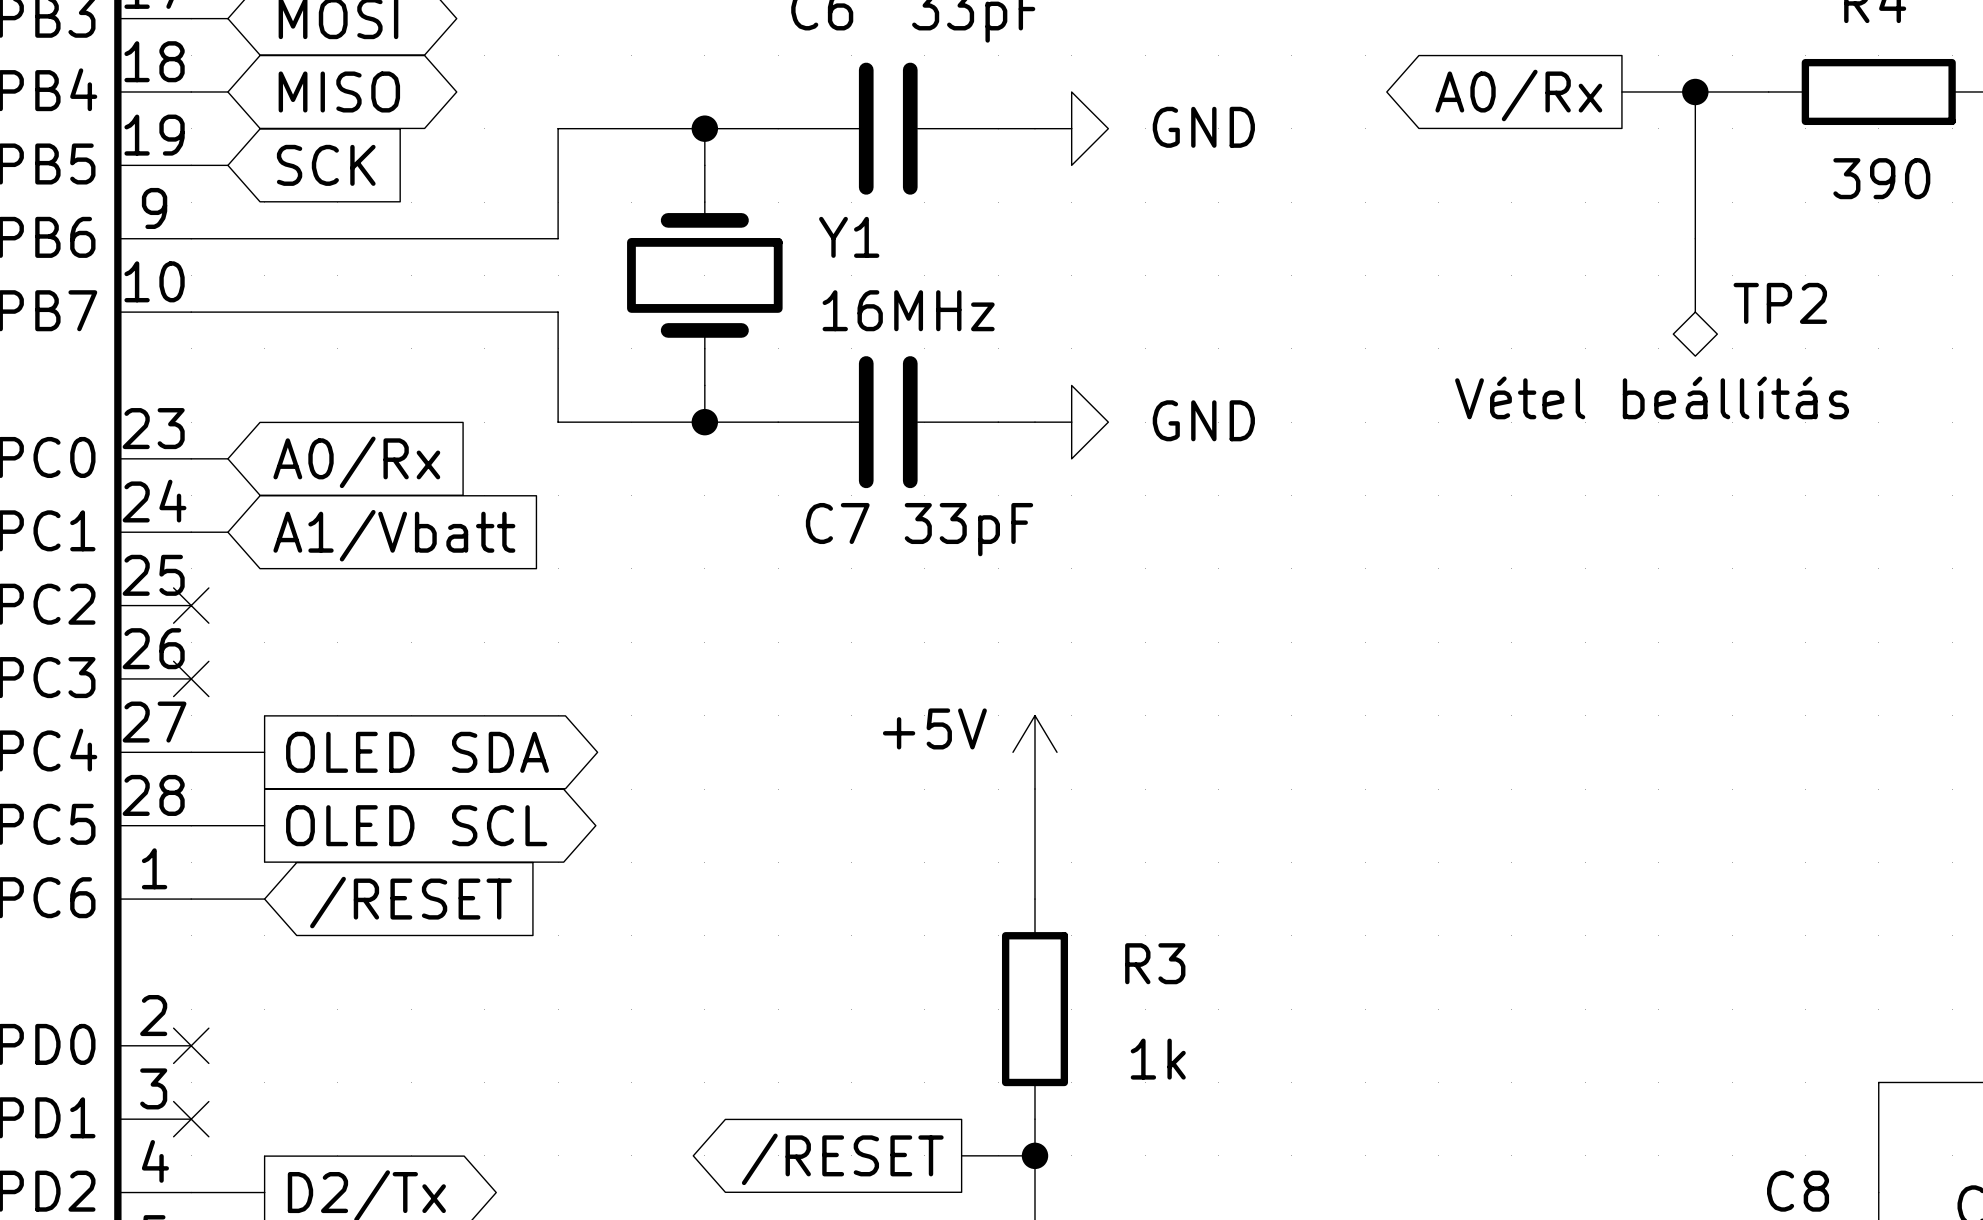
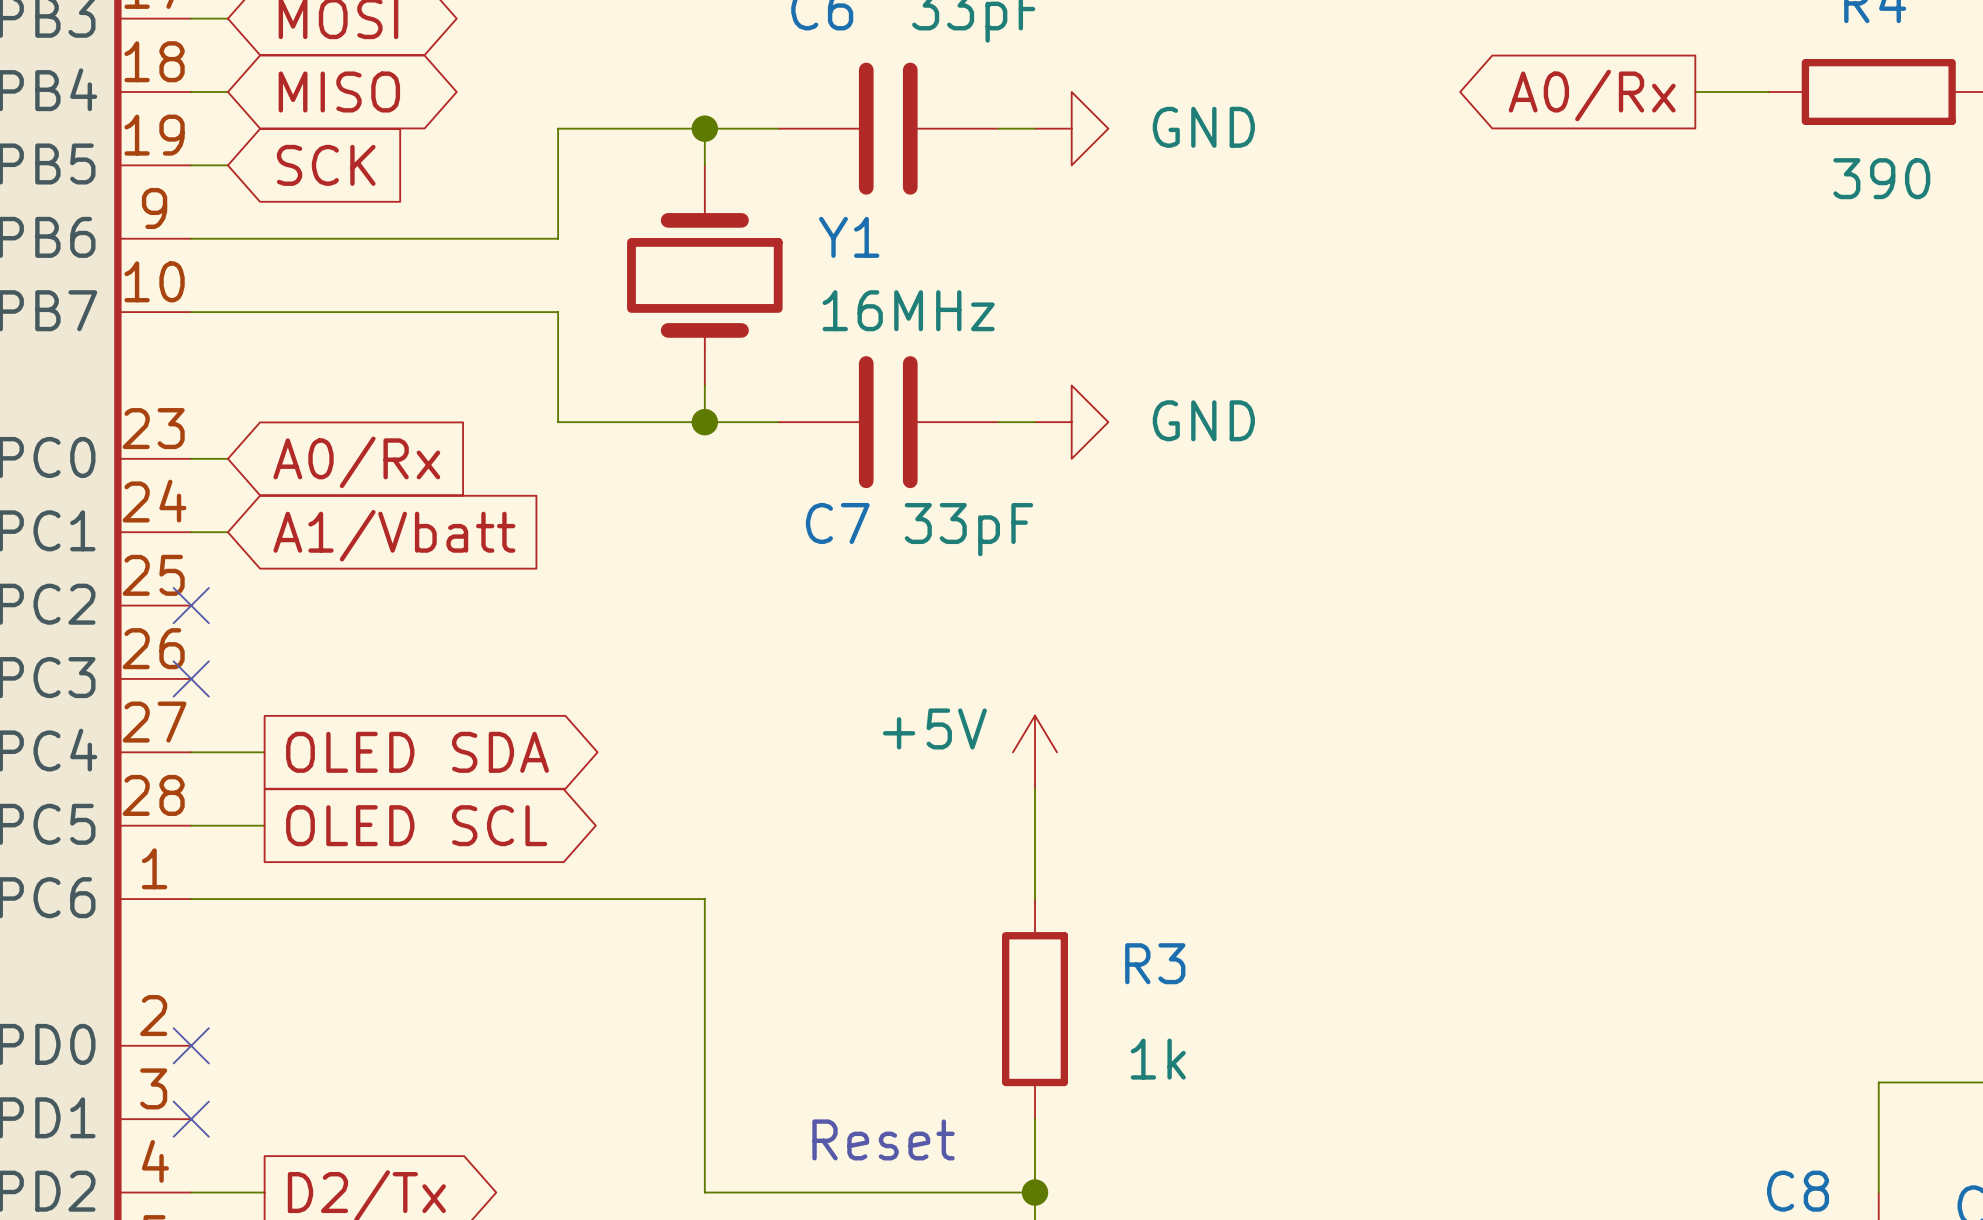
wire: (1621, 91) (1695, 91) (1695, 238) -> none
junction: (1695, 91) -> none
global label position: A0/Rx (1518, 95) -> A0/Rx (1592, 95)
TP2: Vétel beállítás (1695, 297) -> none
wire: none -> (264, 899) (704, 899) (704, 1192) (1034, 1192)
global label: /RESET (410, 902) -> none
text: none -> Reset (883, 1139)
wire: (961, 1155) (1034, 1155) -> none
junction position: (1034, 1155) -> (1034, 1192)
global label: /RESET (842, 1159) -> none

